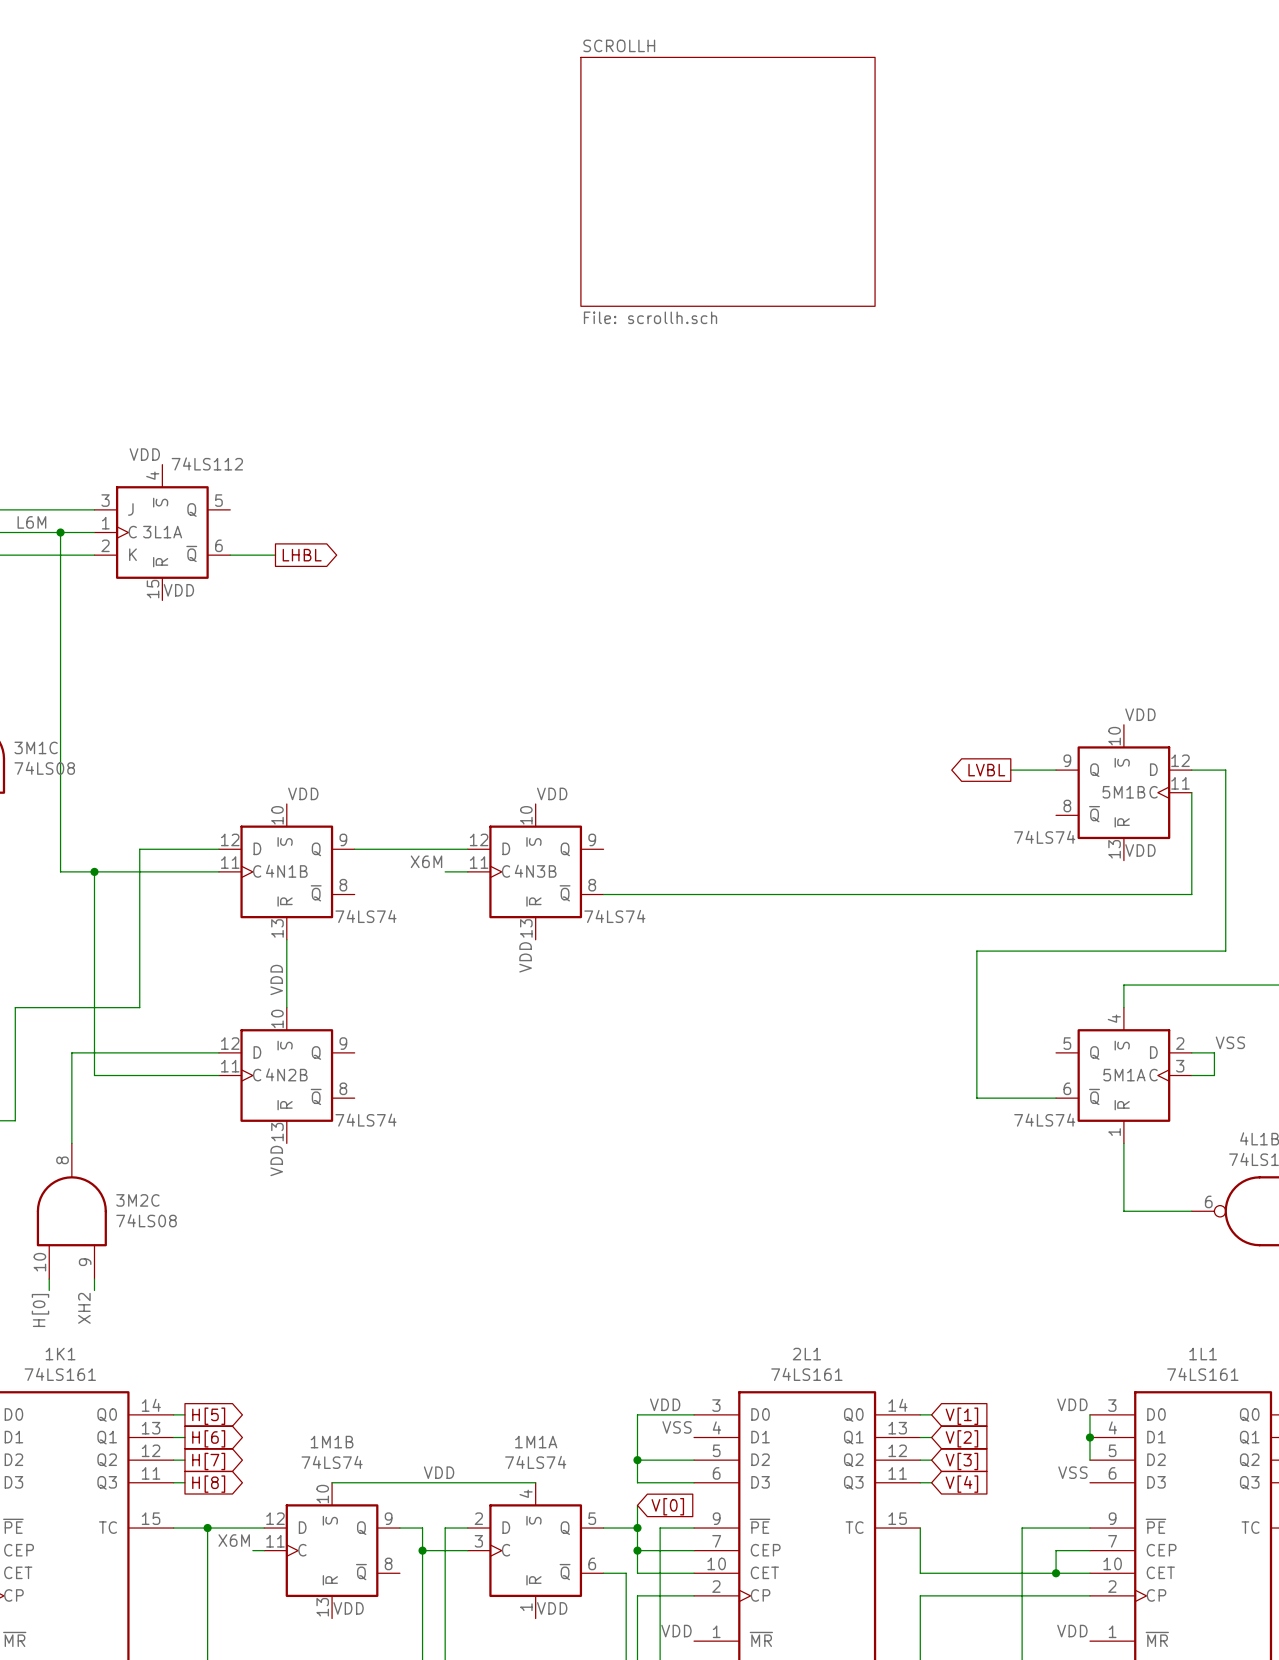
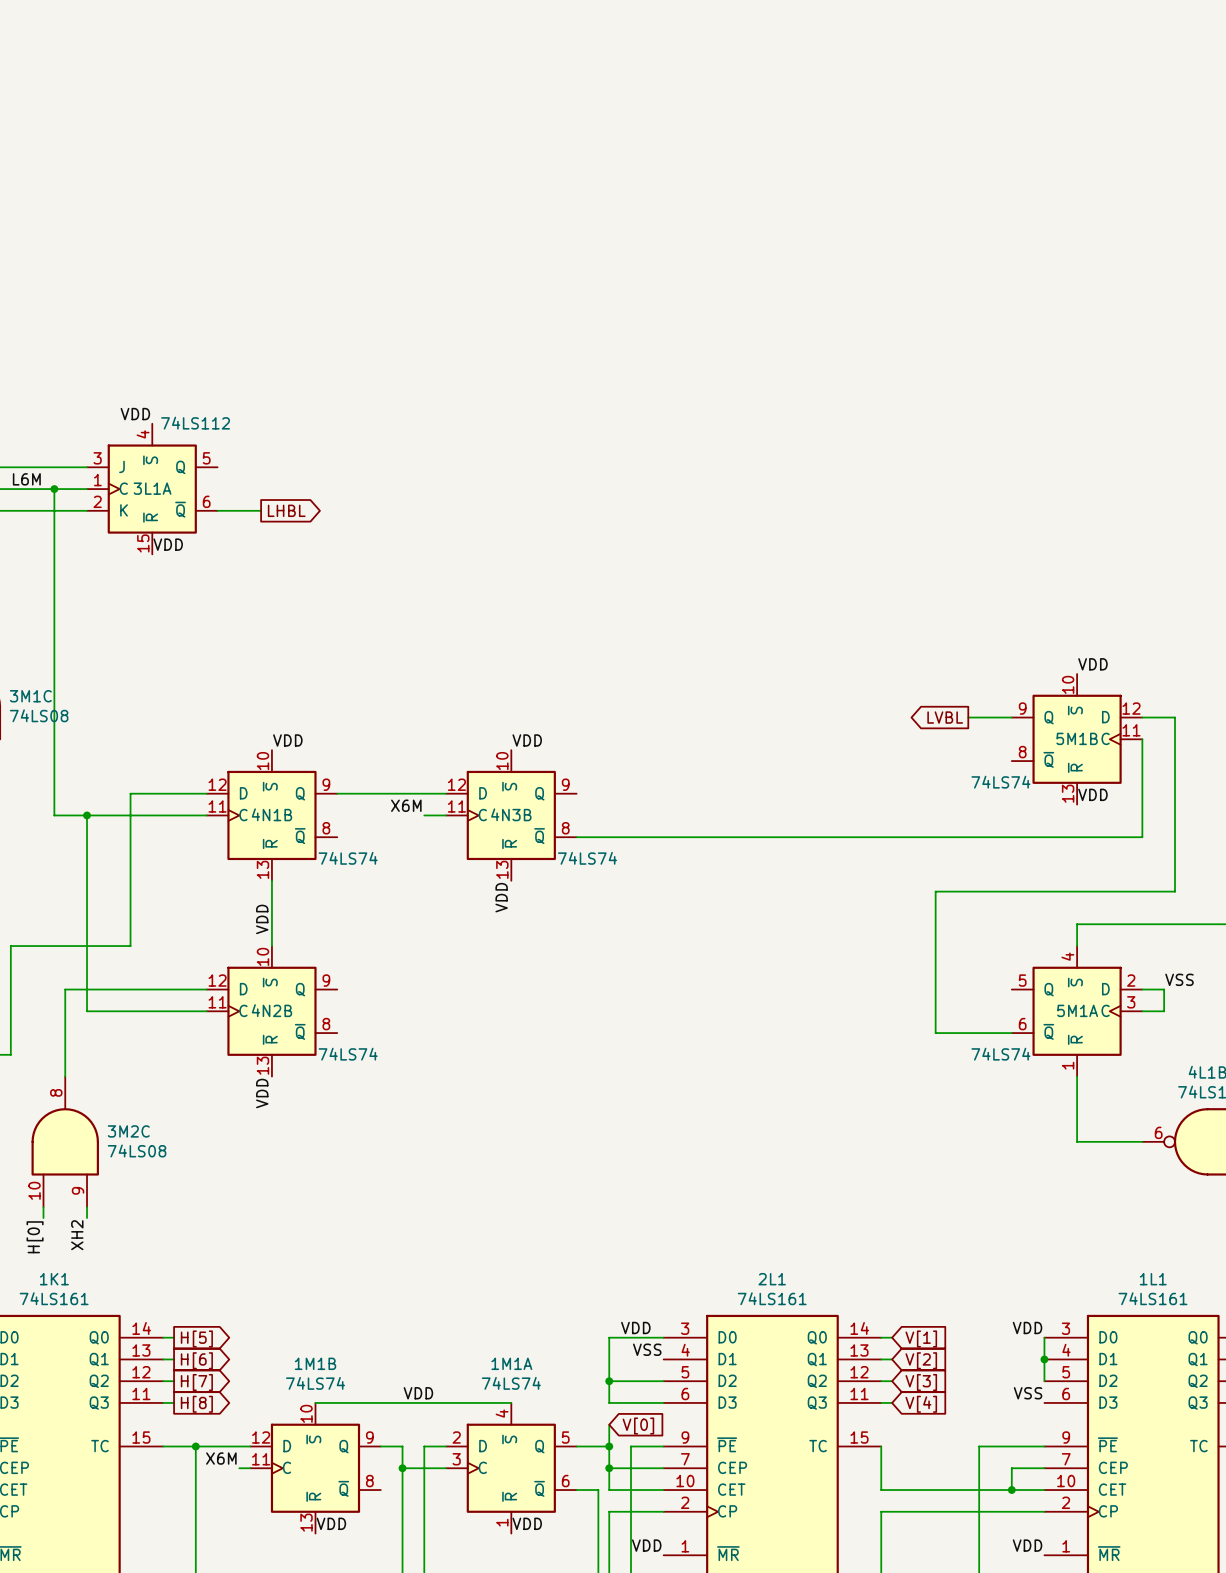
sheet SCROLLH: File: scrollh.sch (727, 181) -> none

